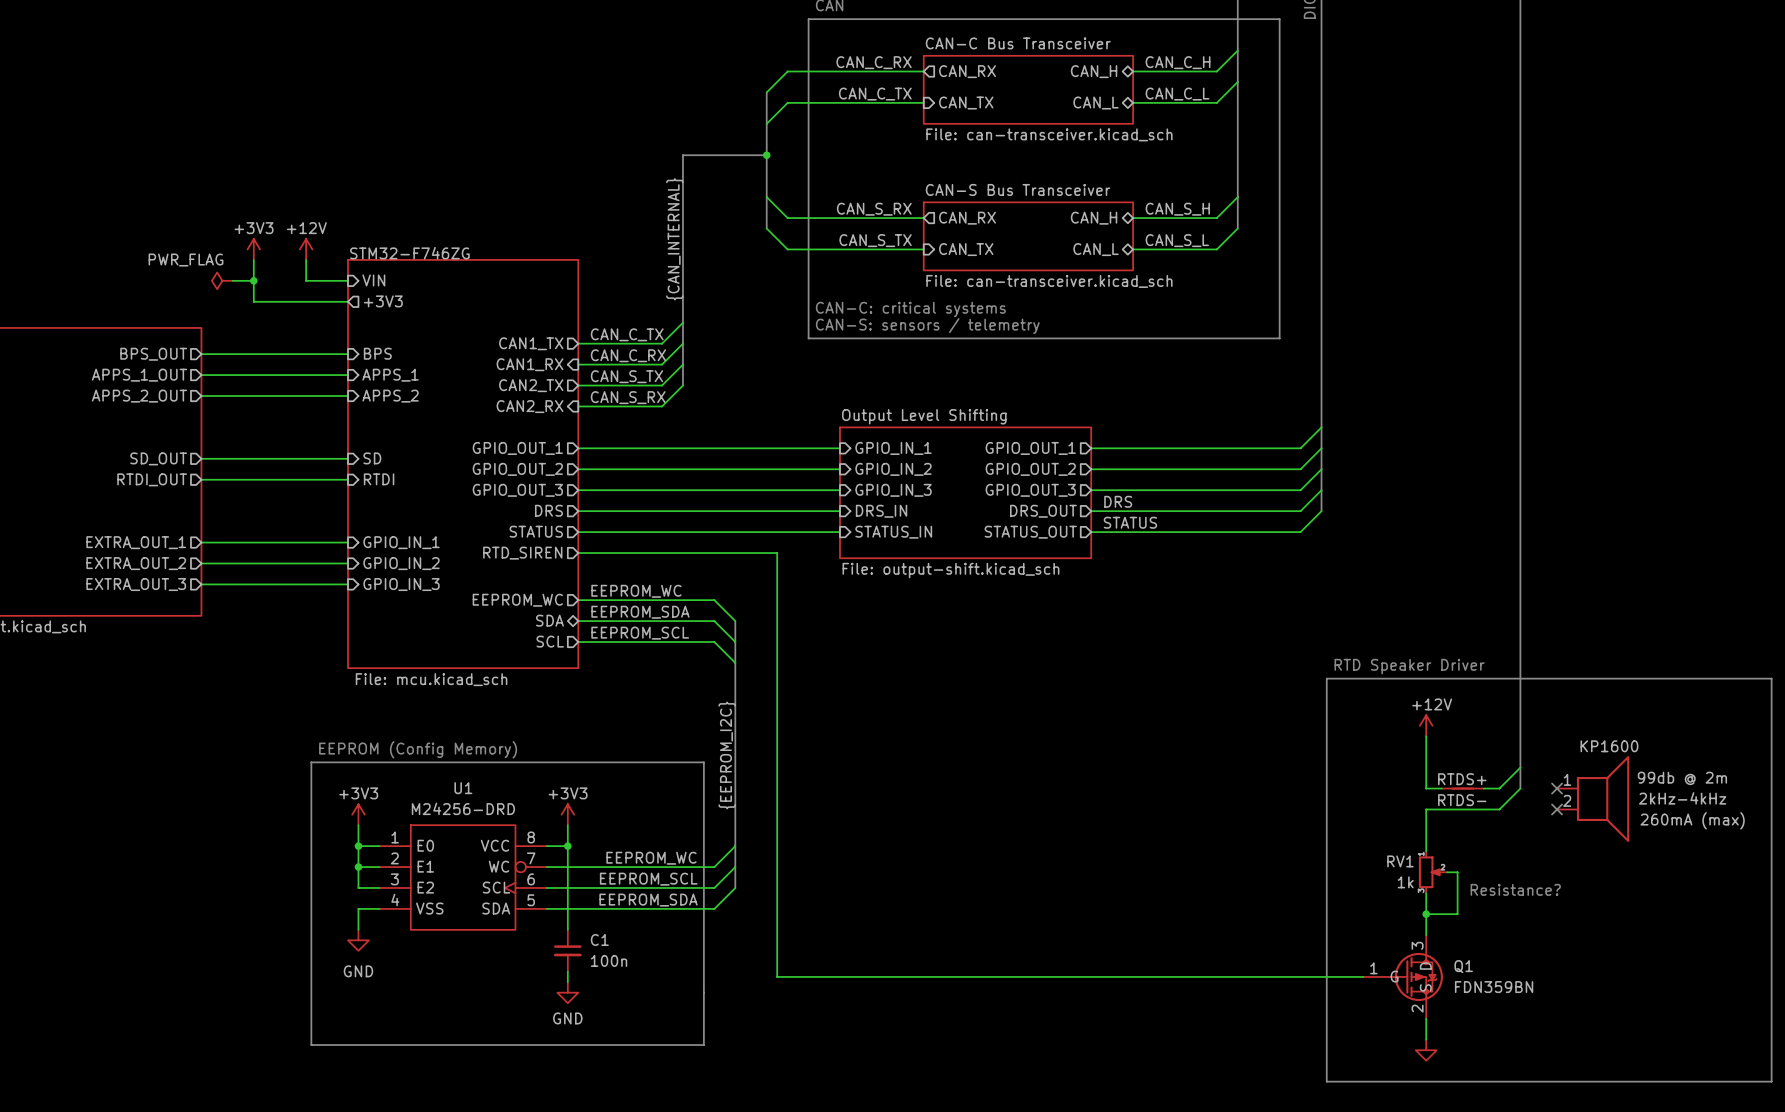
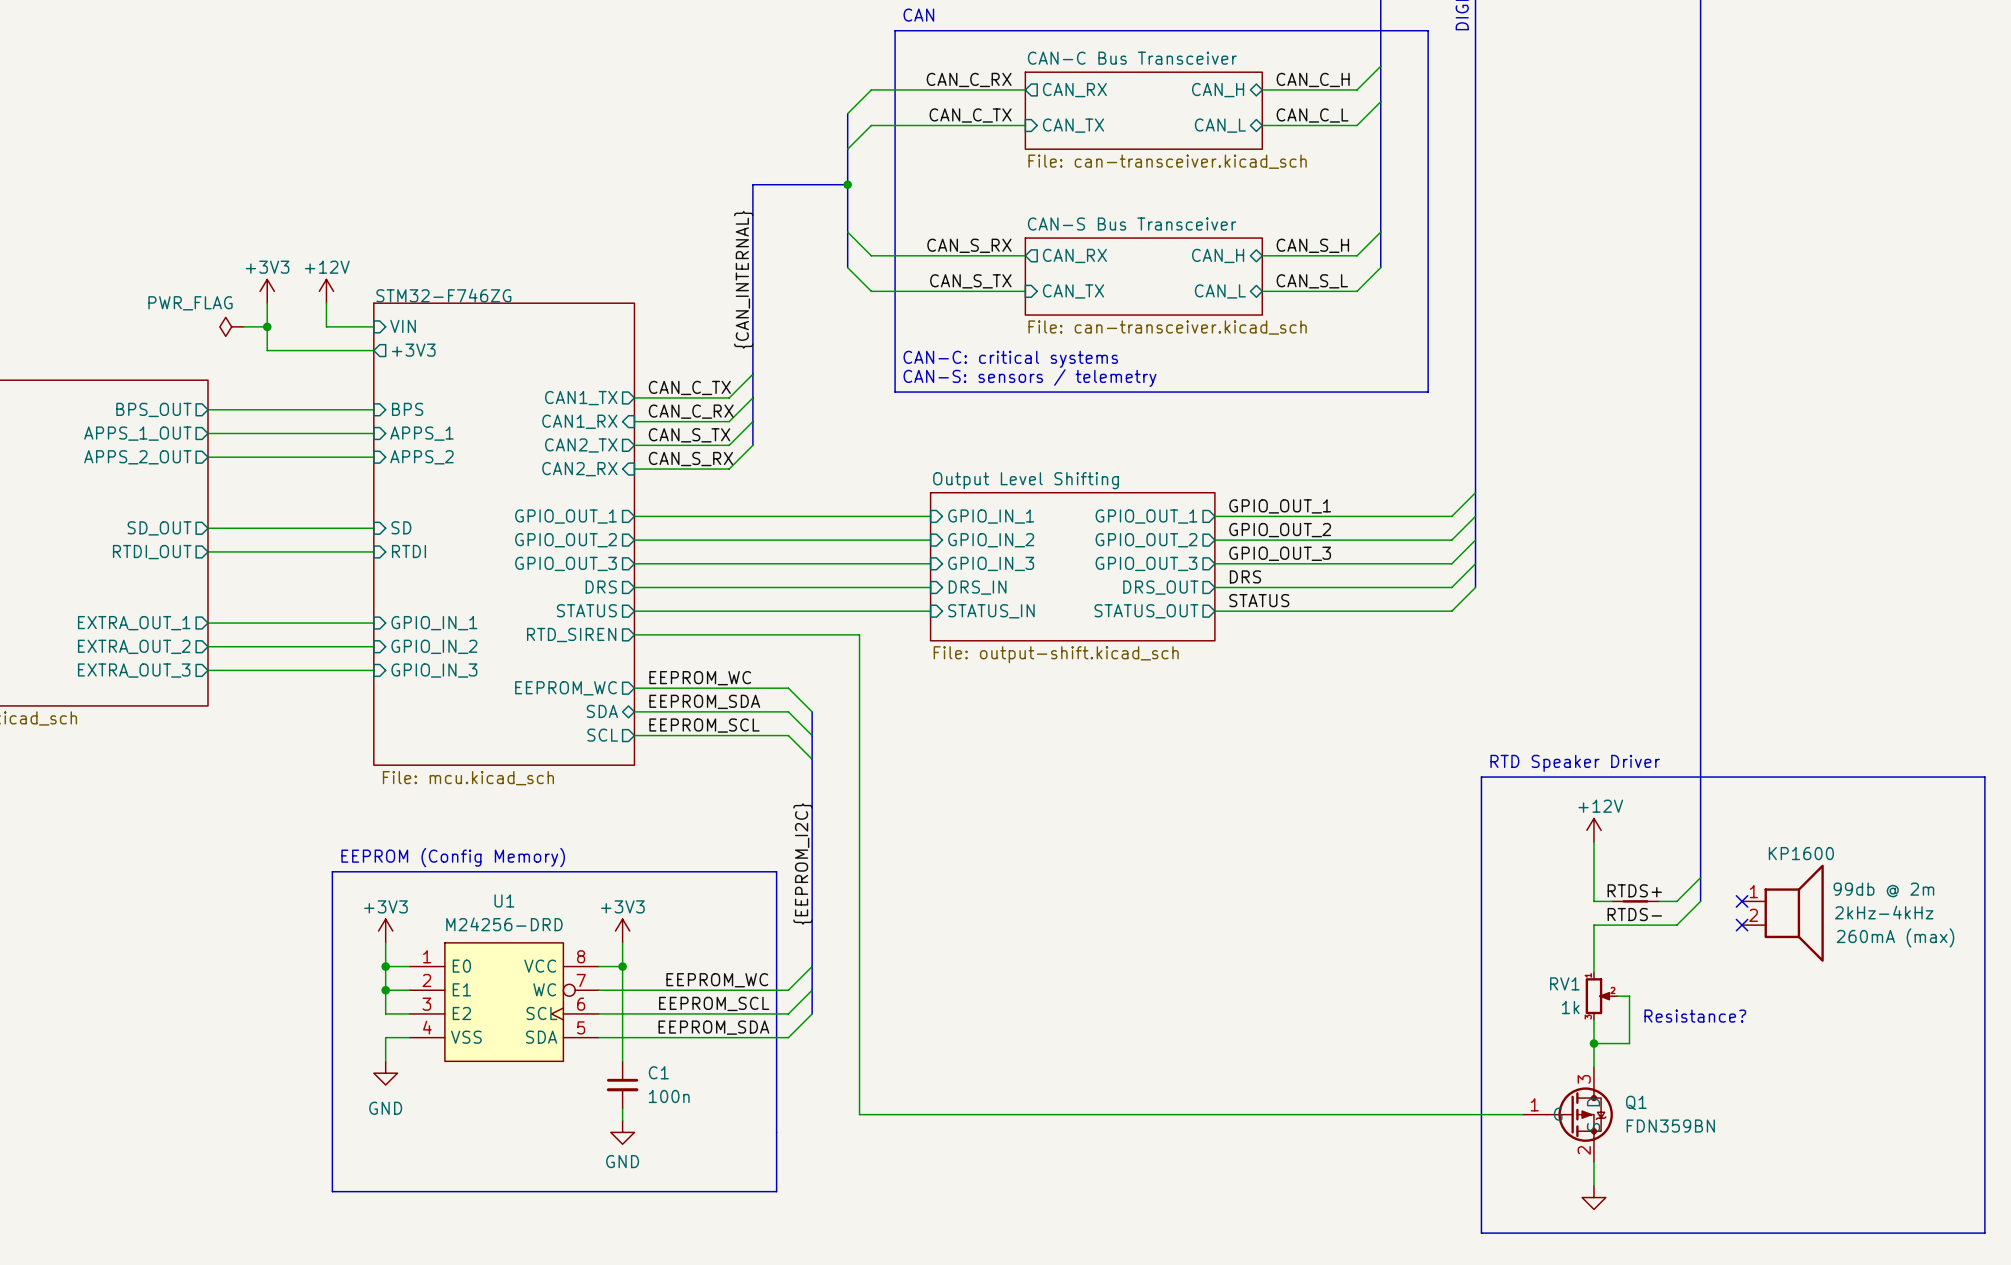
label: none -> GPIO_OUT_1 (1280, 506)
label: none -> GPIO_OUT_2 (1280, 530)
label: none -> GPIO_OUT_3 (1280, 553)

